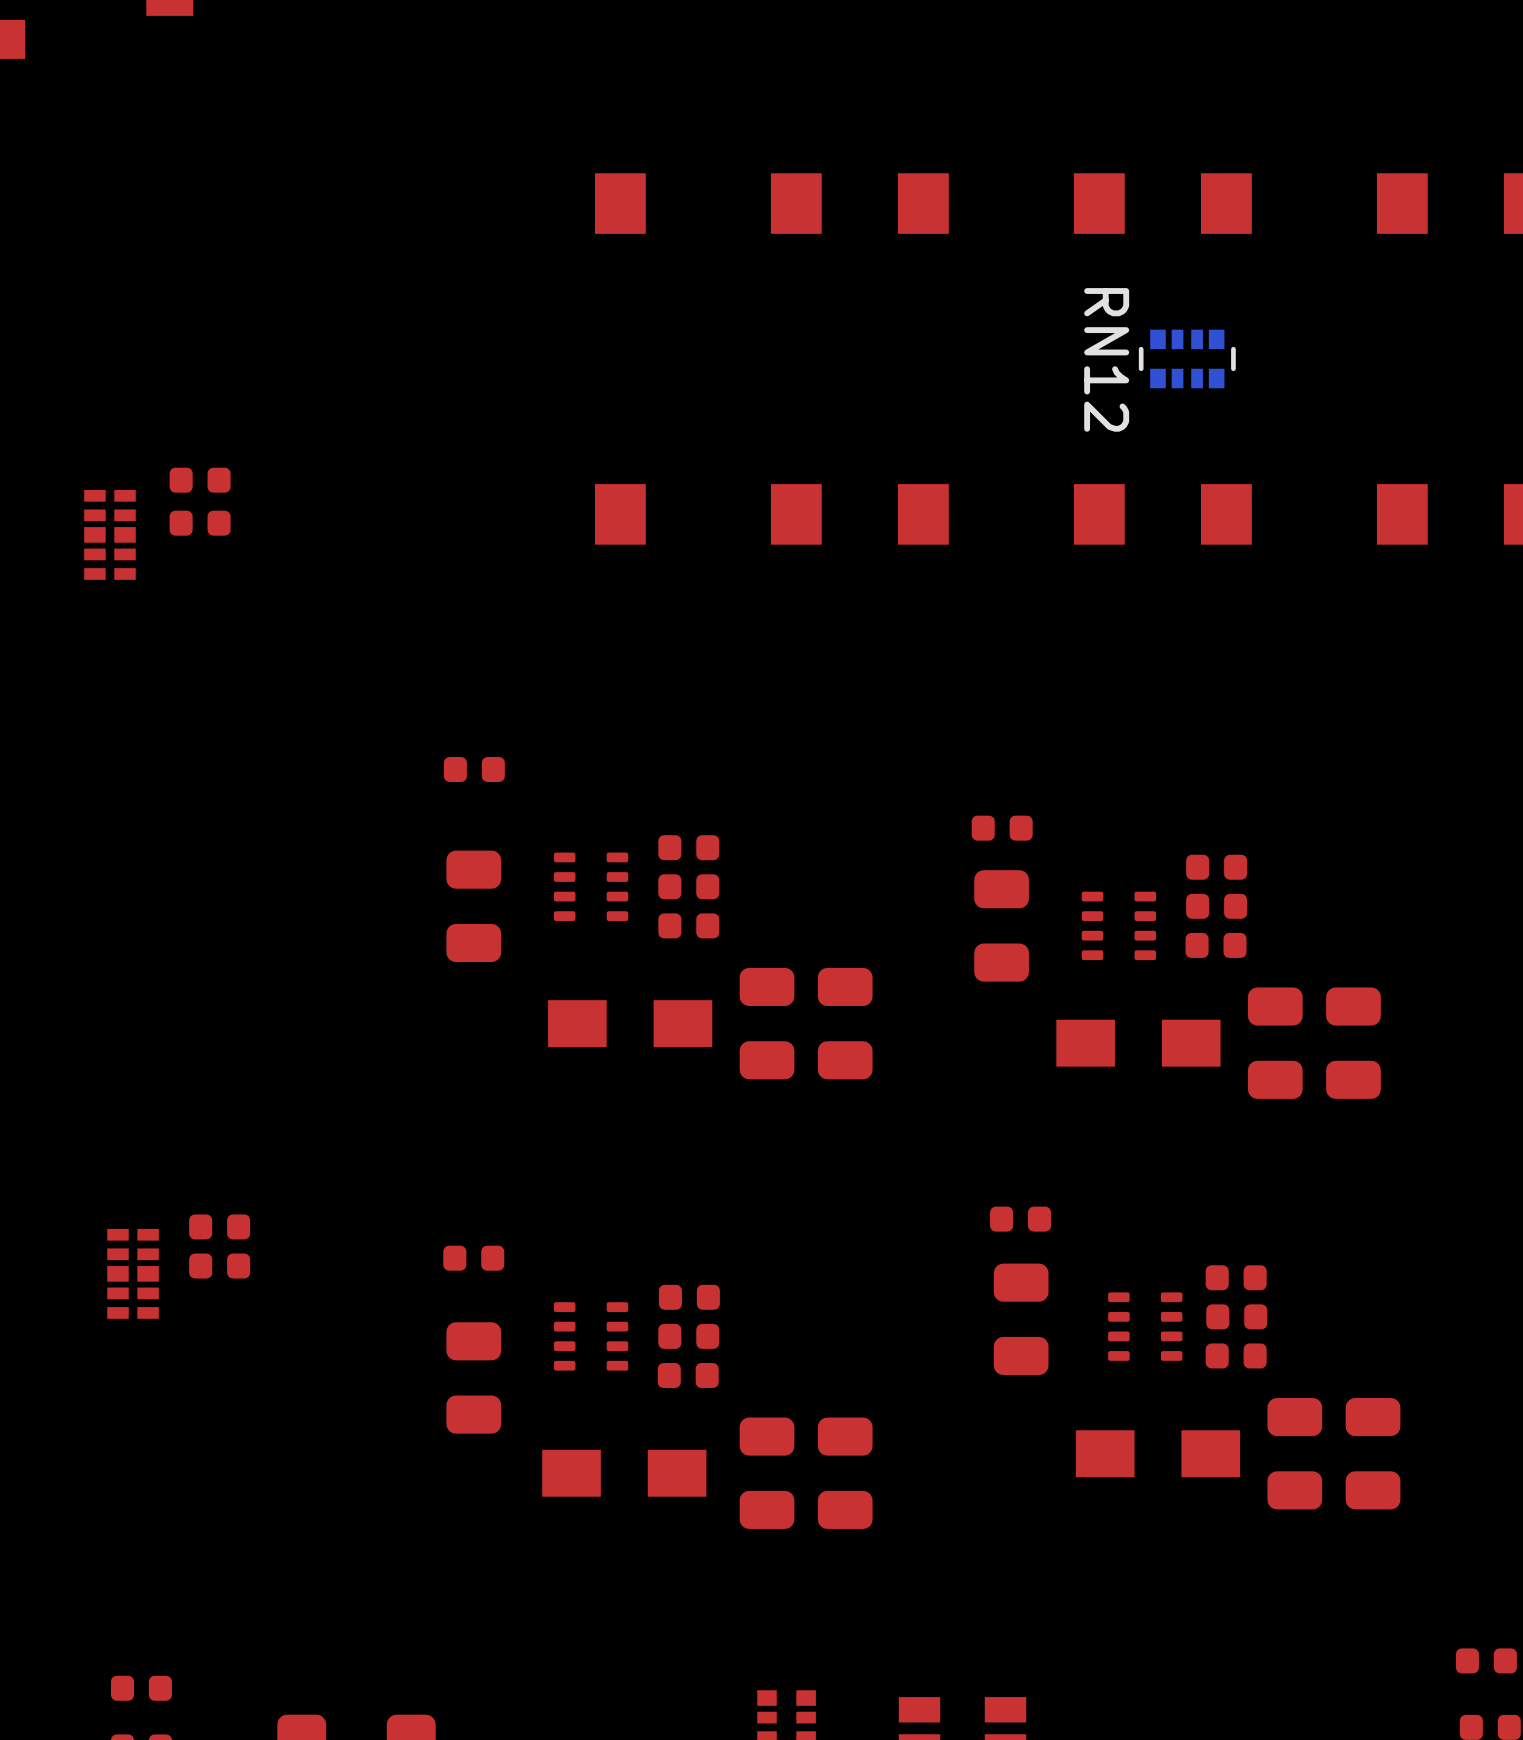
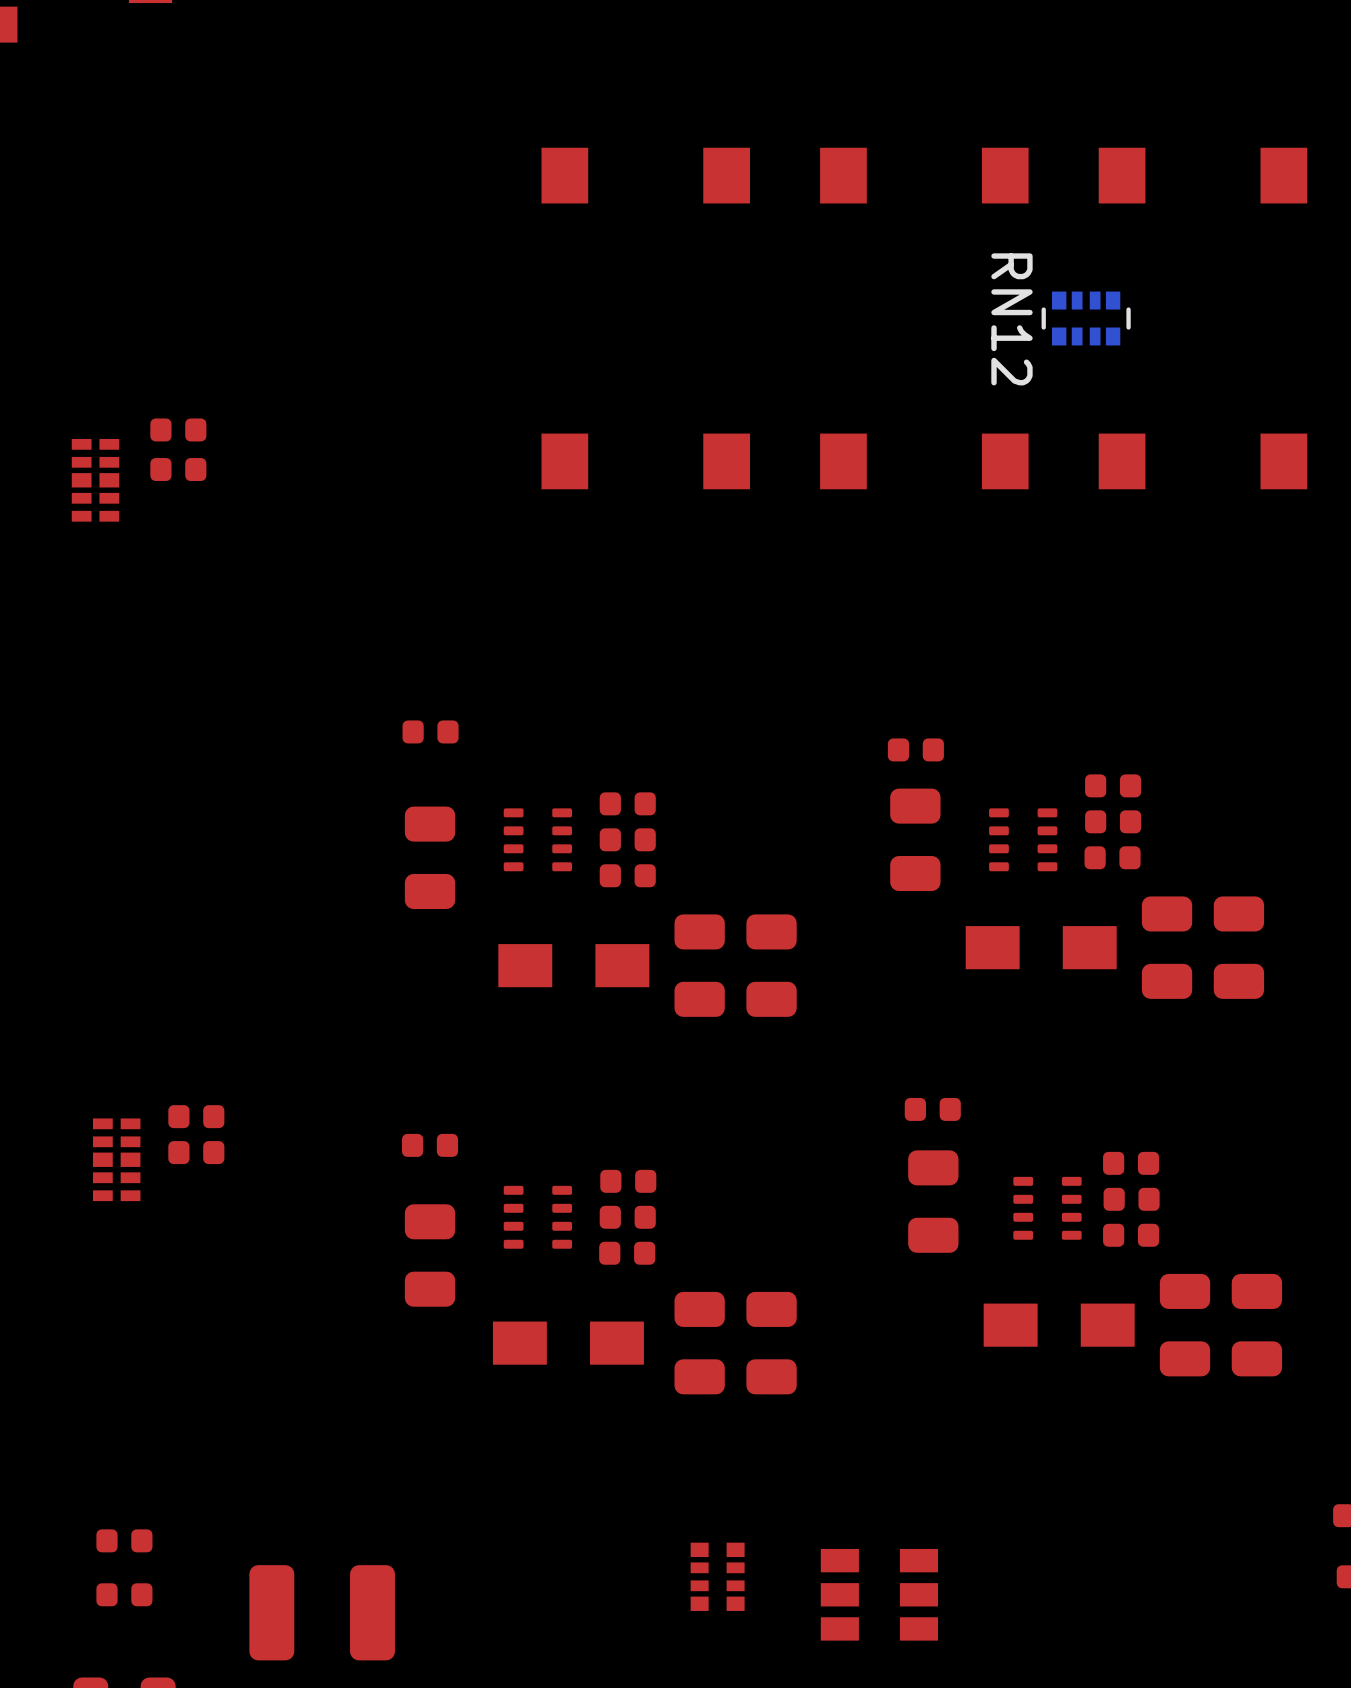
part position: (474, 769) -> (430, 731)
part position: (688, 847) -> (627, 875)
part position: (591, 886) -> (537, 839)
part position: (473, 906) -> (430, 857)
part position: (630, 1023) -> (573, 965)
part position: (767, 1023) -> (699, 965)
part position: (845, 1023) -> (771, 965)

